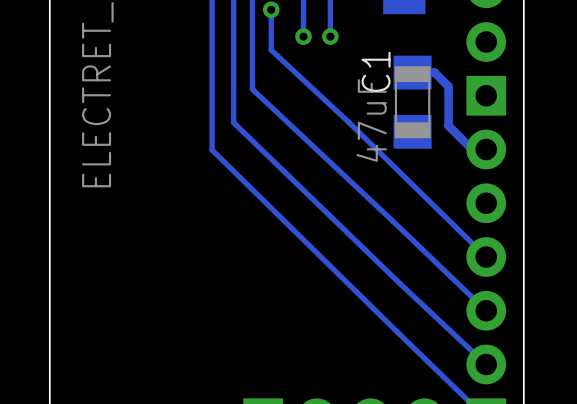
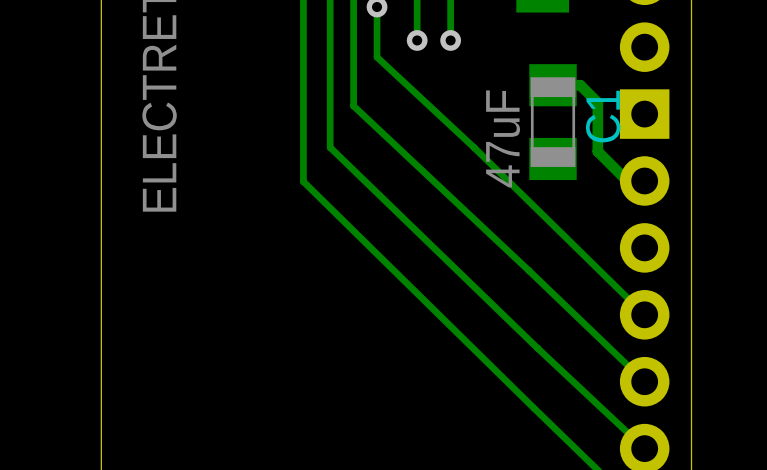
C1 name position: C1 (376, 71) -> C1 (603, 116)

